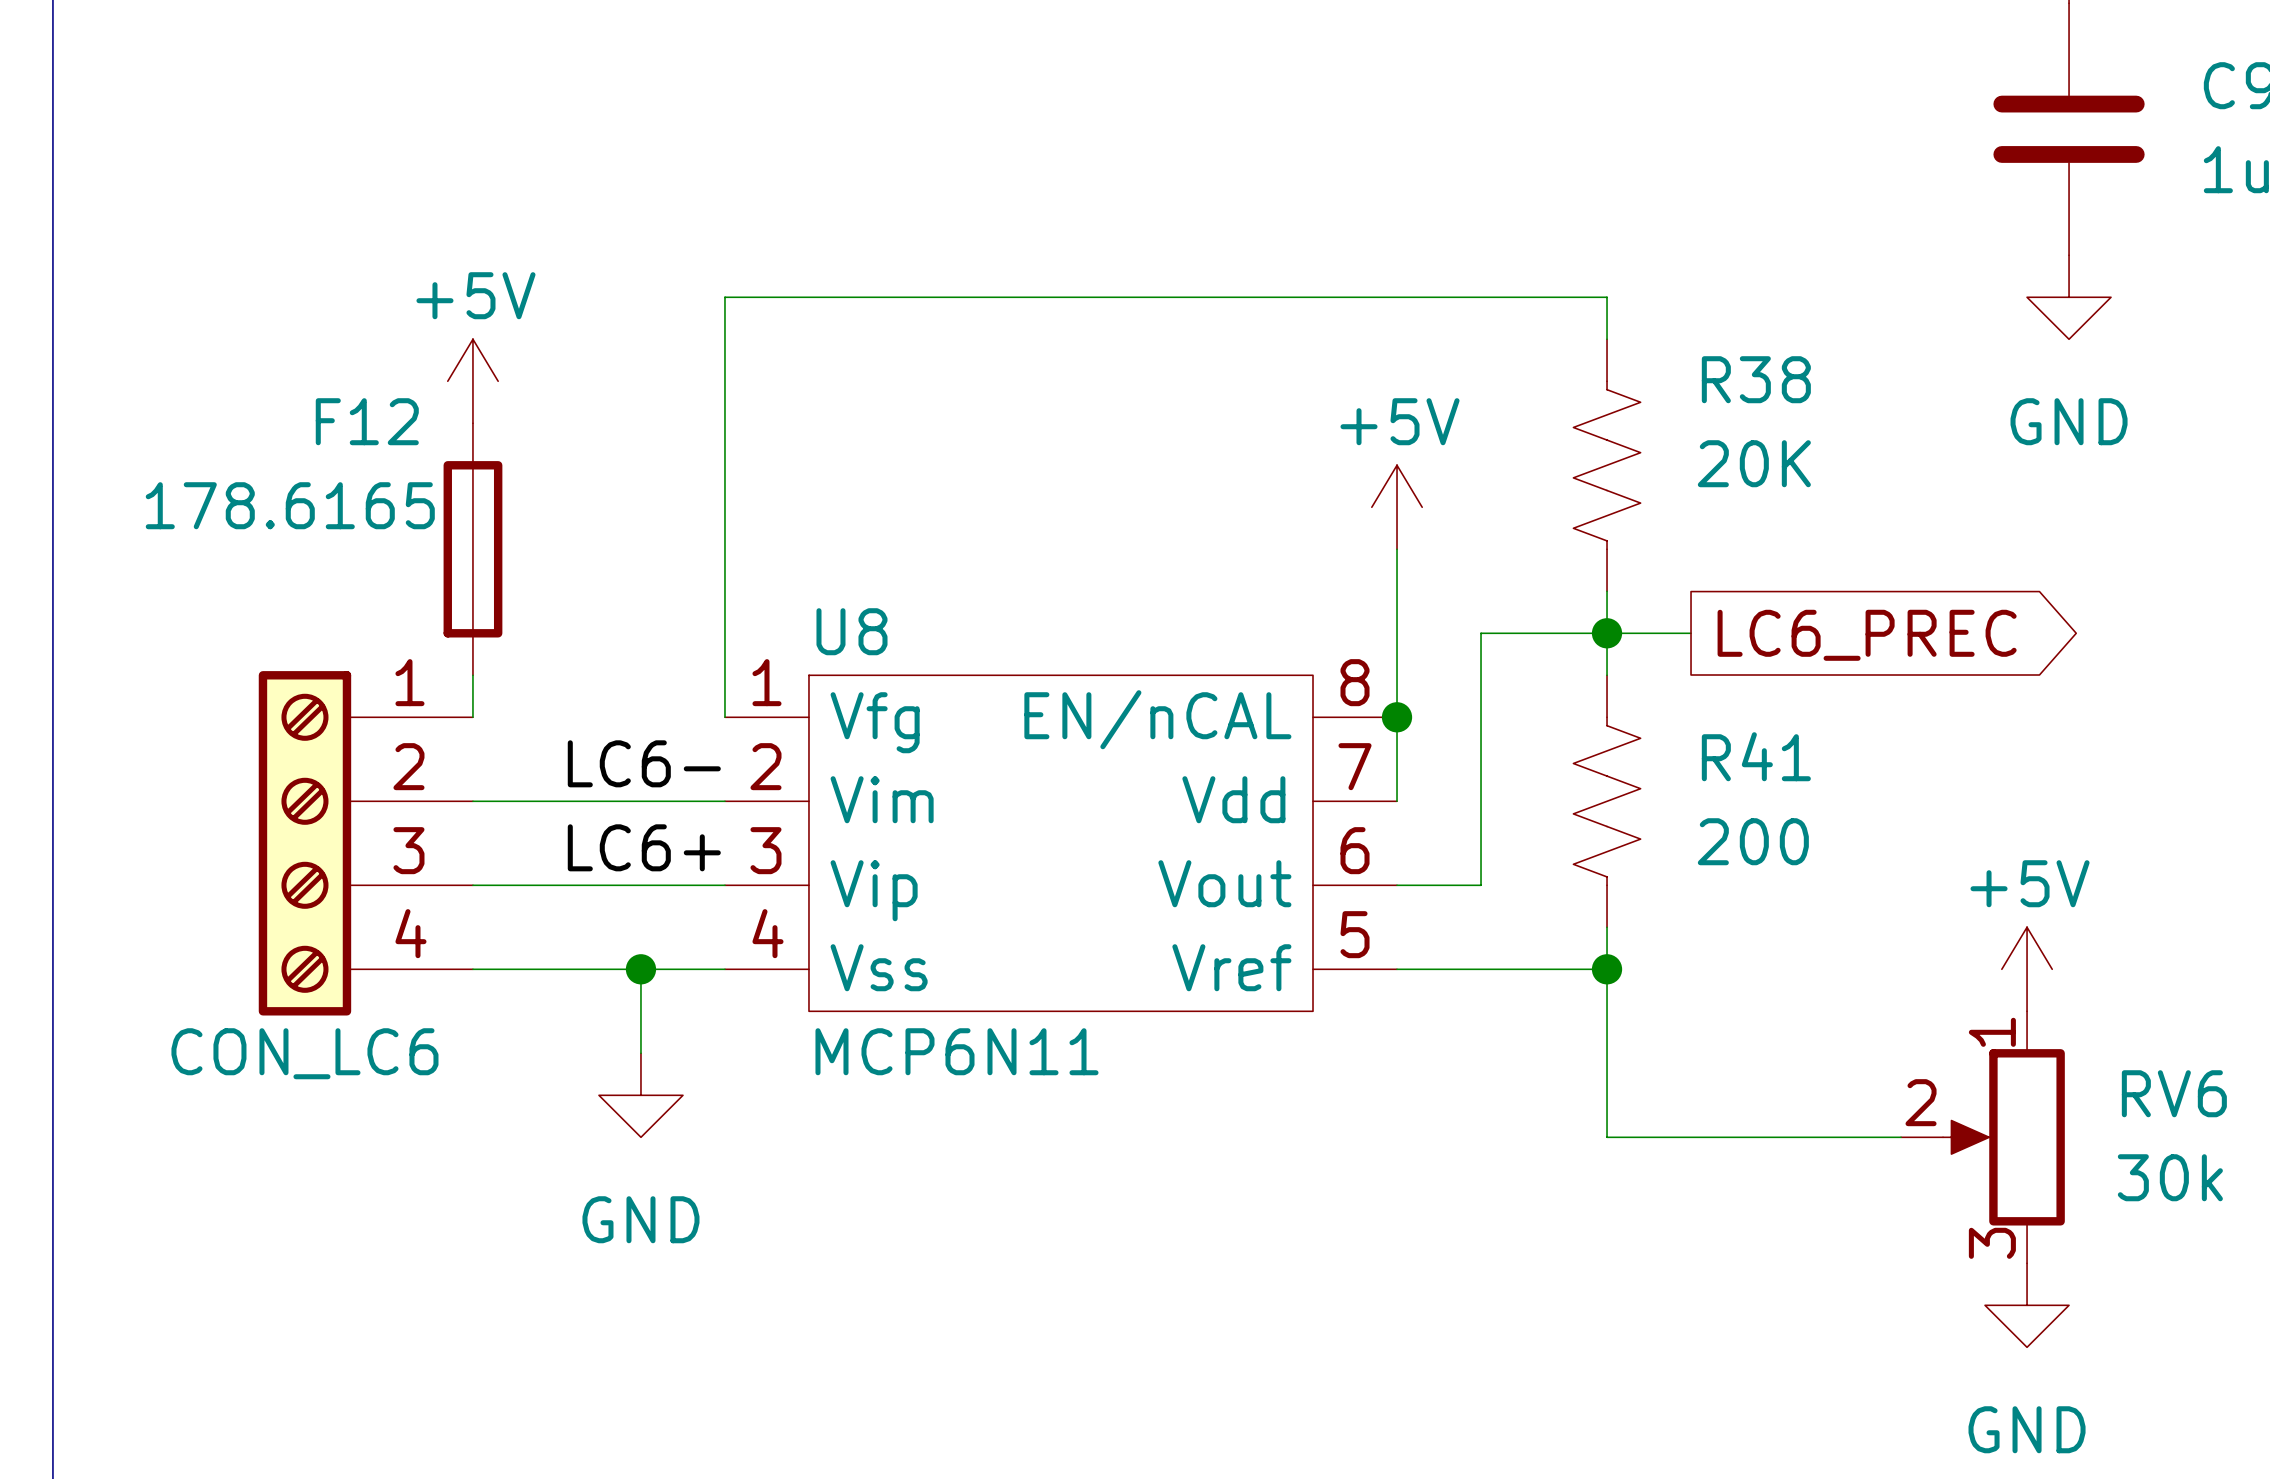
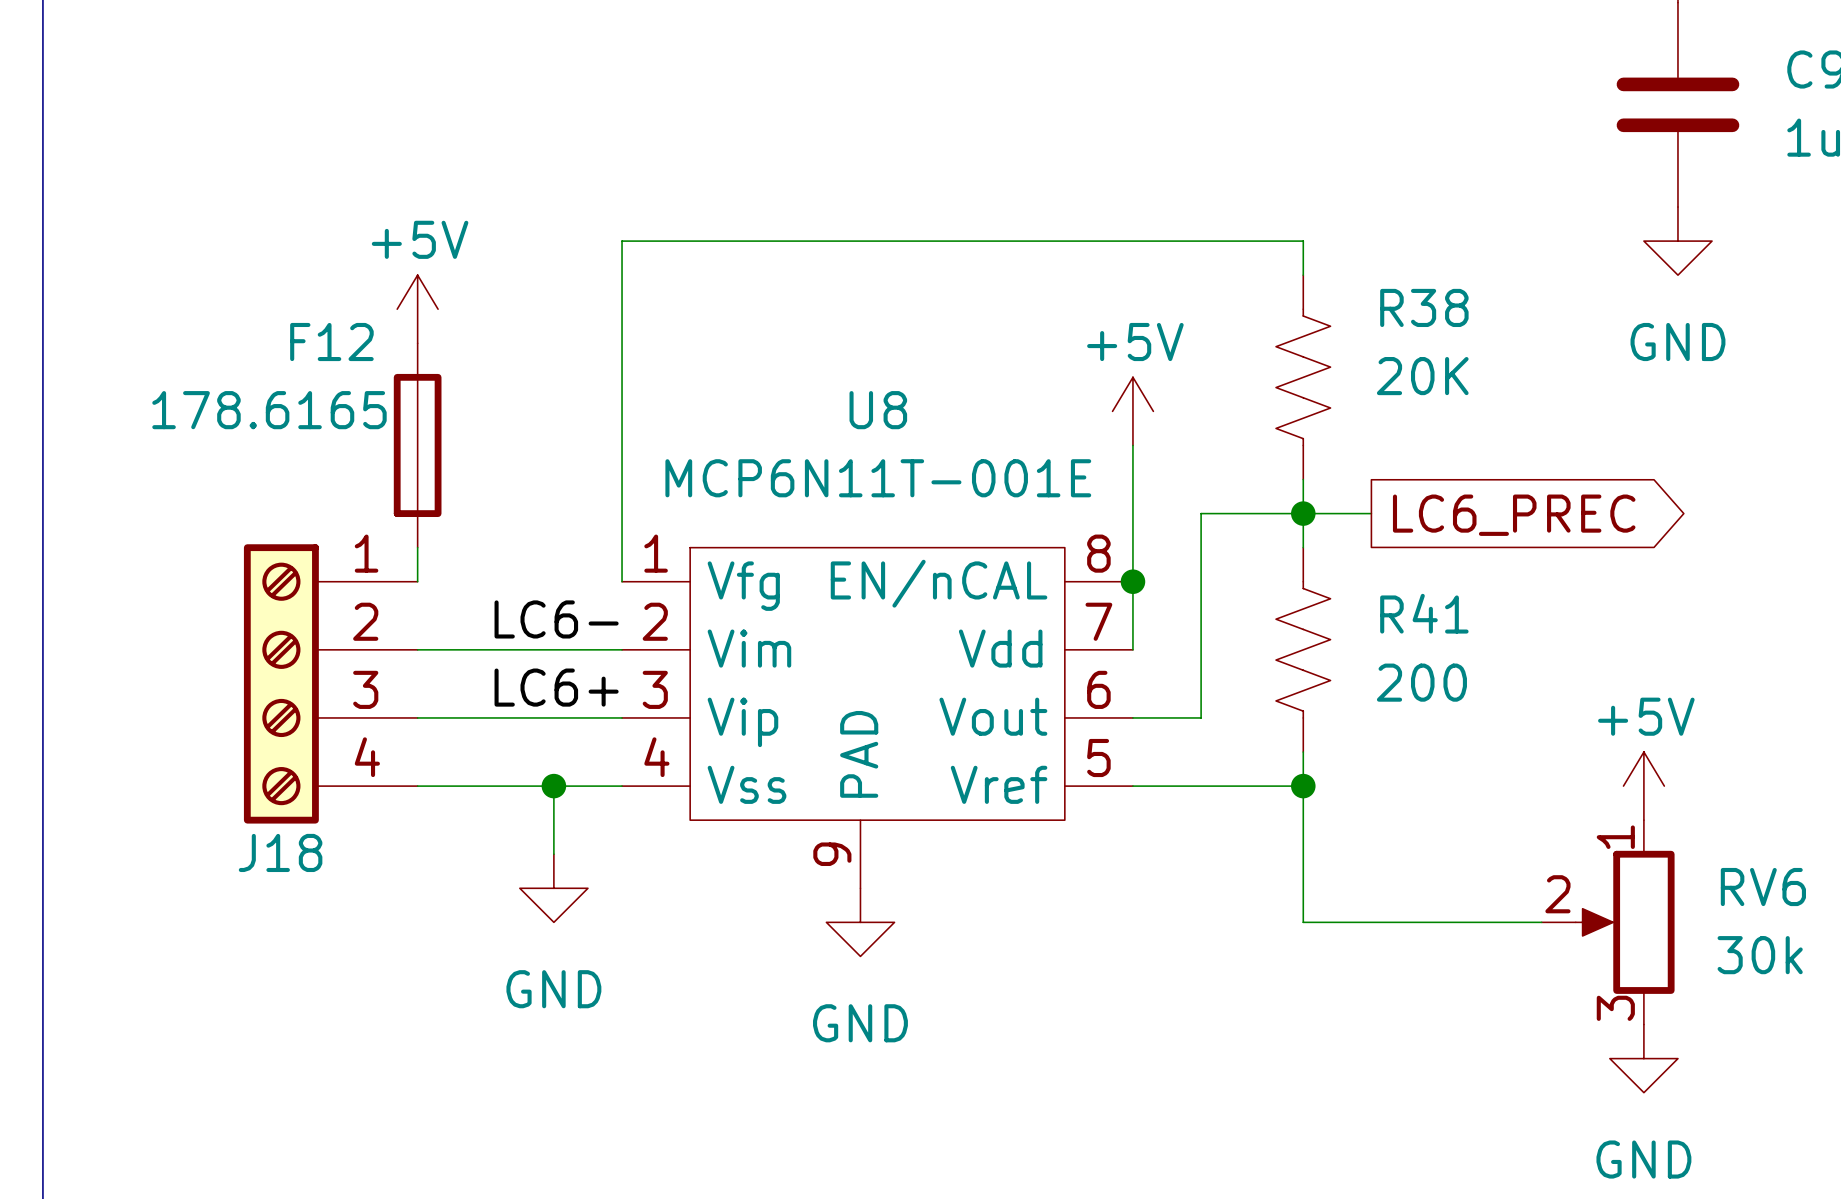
wire: (766, 297) (724, 297) (724, 717) -> (622, 241) (622, 581)
power symbol position: +5V (472, 381) -> +5V (417, 309)
F12 position: (472, 549) -> (417, 445)
U8 name position: U8 (851, 631) -> U8 (878, 410)
wire: (472, 675) (472, 717) -> (417, 547) (417, 581)
U8 symbol: [724, 675, 1398, 1012] -> [622, 547, 1133, 889]
label position: LC6- (644, 763) -> LC6- (556, 619)
CON_LC6: (365, 843) -> none
J18: none -> (330, 683)
label position: LC6+ (644, 847) -> LC6+ (556, 687)
wire: (640, 969) (640, 1053) -> (553, 786) (553, 854)
junction position: (640, 969) -> (553, 786)
U8 value: MCP6N11 (956, 1051) -> MCP6N11T-001E (878, 478)
power symbol position: GND (640, 1095) -> GND (553, 888)
power symbol: none -> GND (860, 922)

